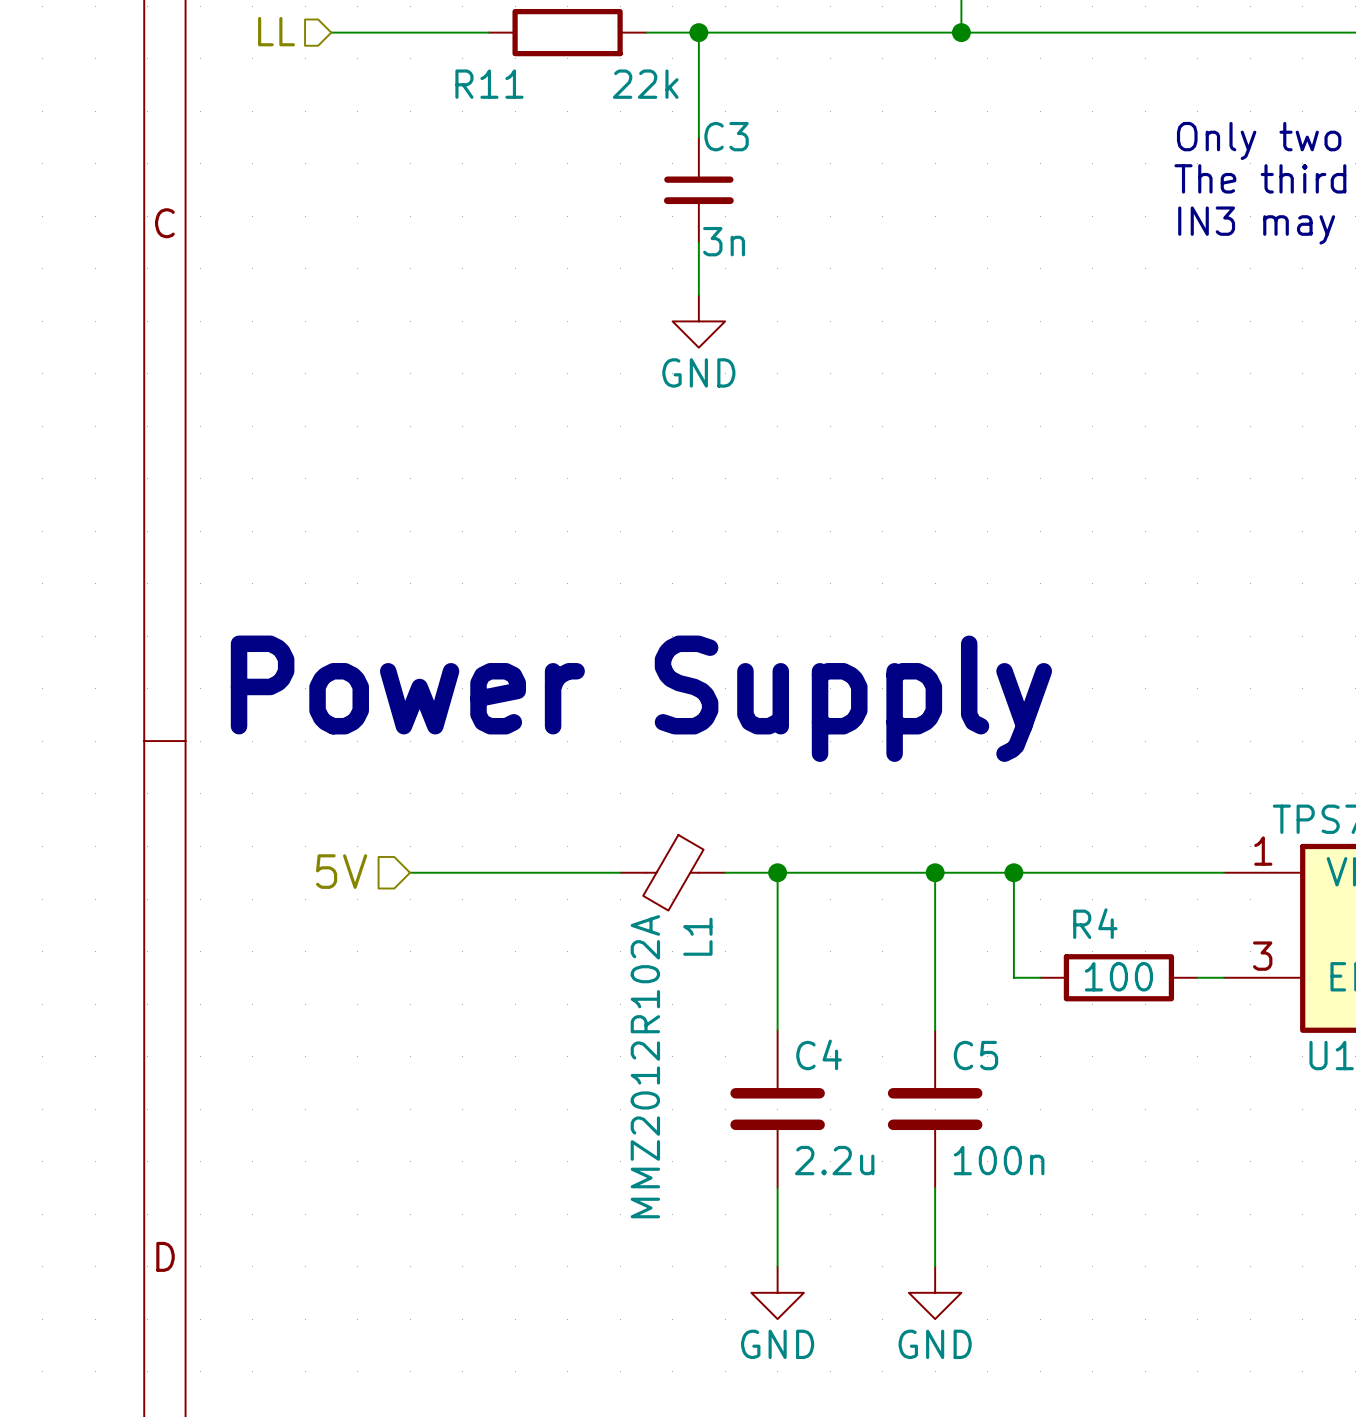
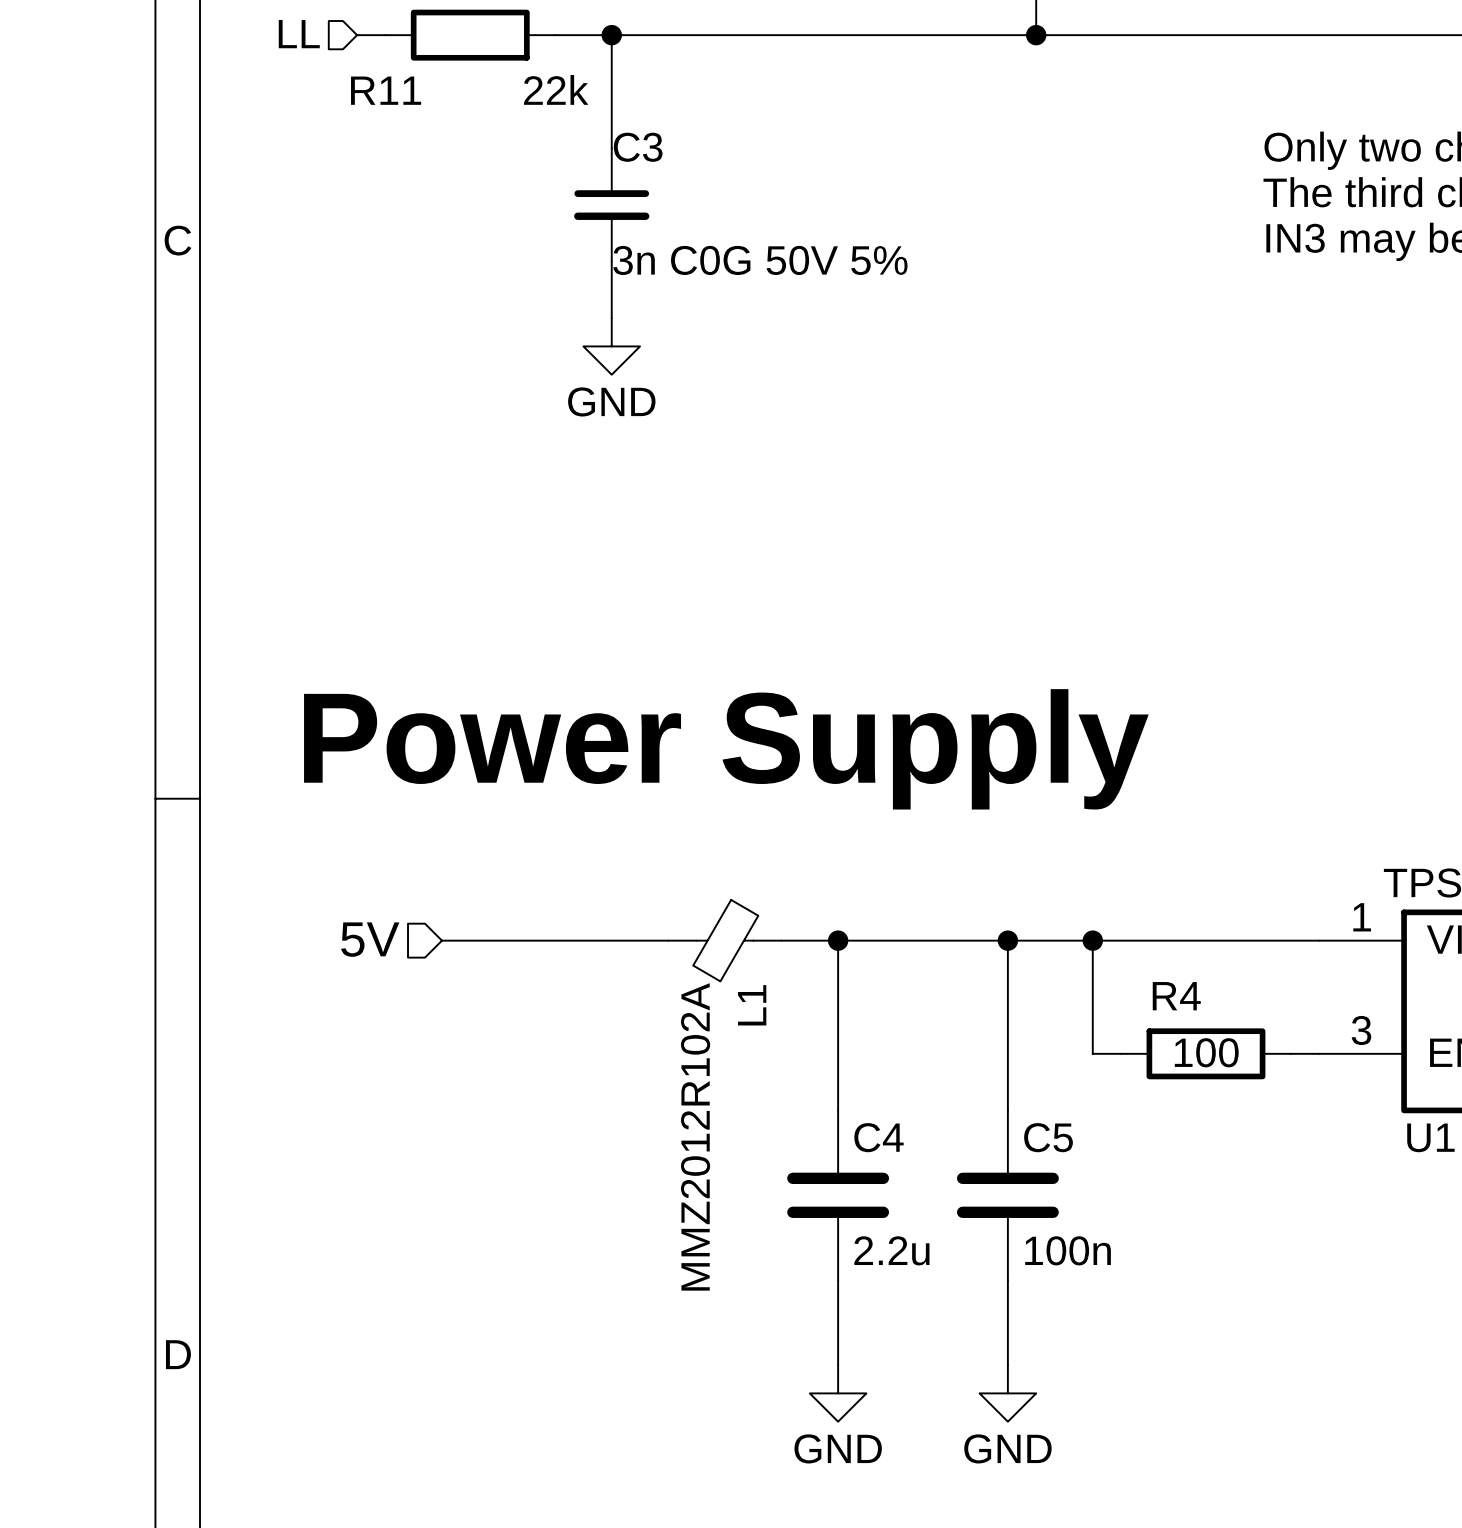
wire: (357, 32) (488, 32) -> (555, 35) (696, 35)
junction: none -> (611, 35)
R11 position: (567, 32) -> (470, 35)
wire: (698, 32) (698, 137) -> (611, 35) (611, 148)
junction: (698, 32) -> none
C3 position: (698, 190) -> (611, 204)
C3 value: 3n (724, 241) -> 3n C0G 50V 5% (760, 260)
wire: (698, 242) (698, 295) -> (611, 261) (611, 318)
power symbol position: GND (698, 321) -> GND (611, 346)

